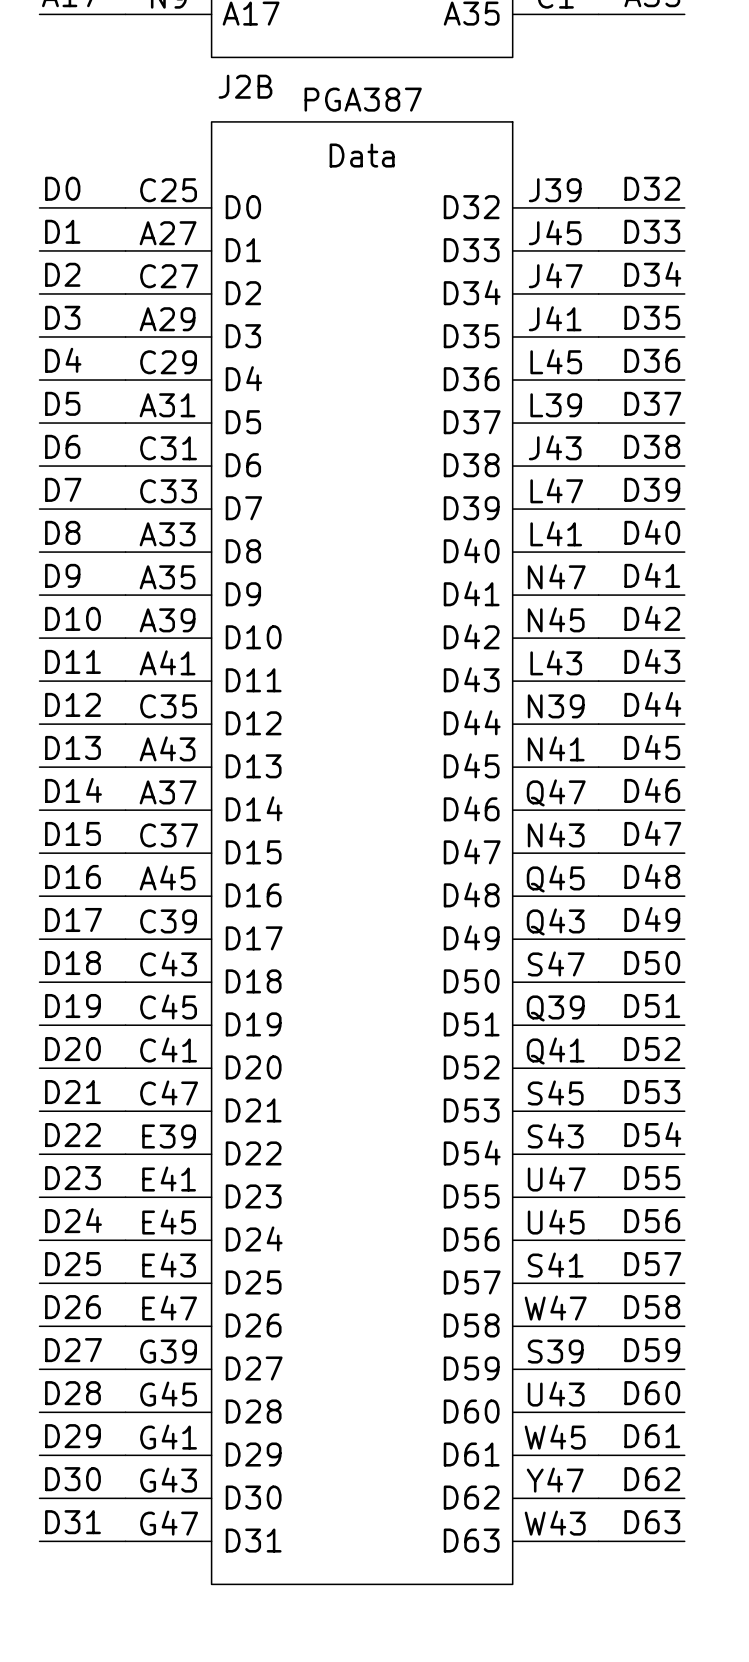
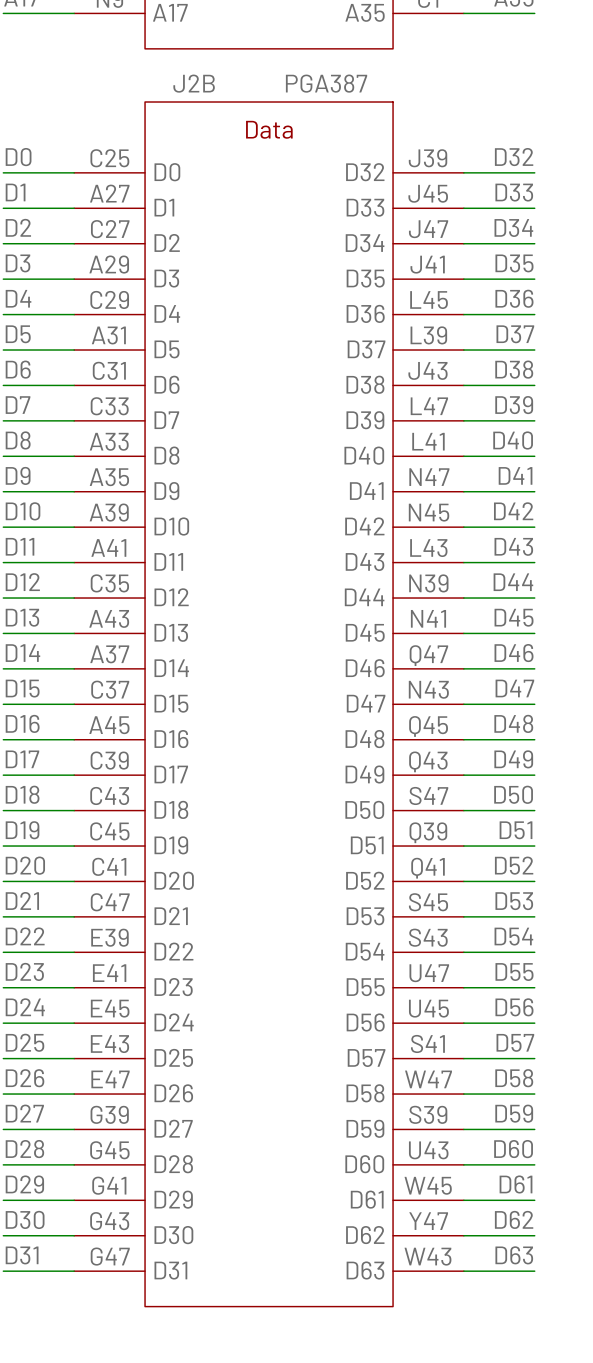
J2B name position: J2B (245, 86) -> J2B (194, 83)
J2B value position: PGA387 (363, 99) -> PGA387 (326, 83)

